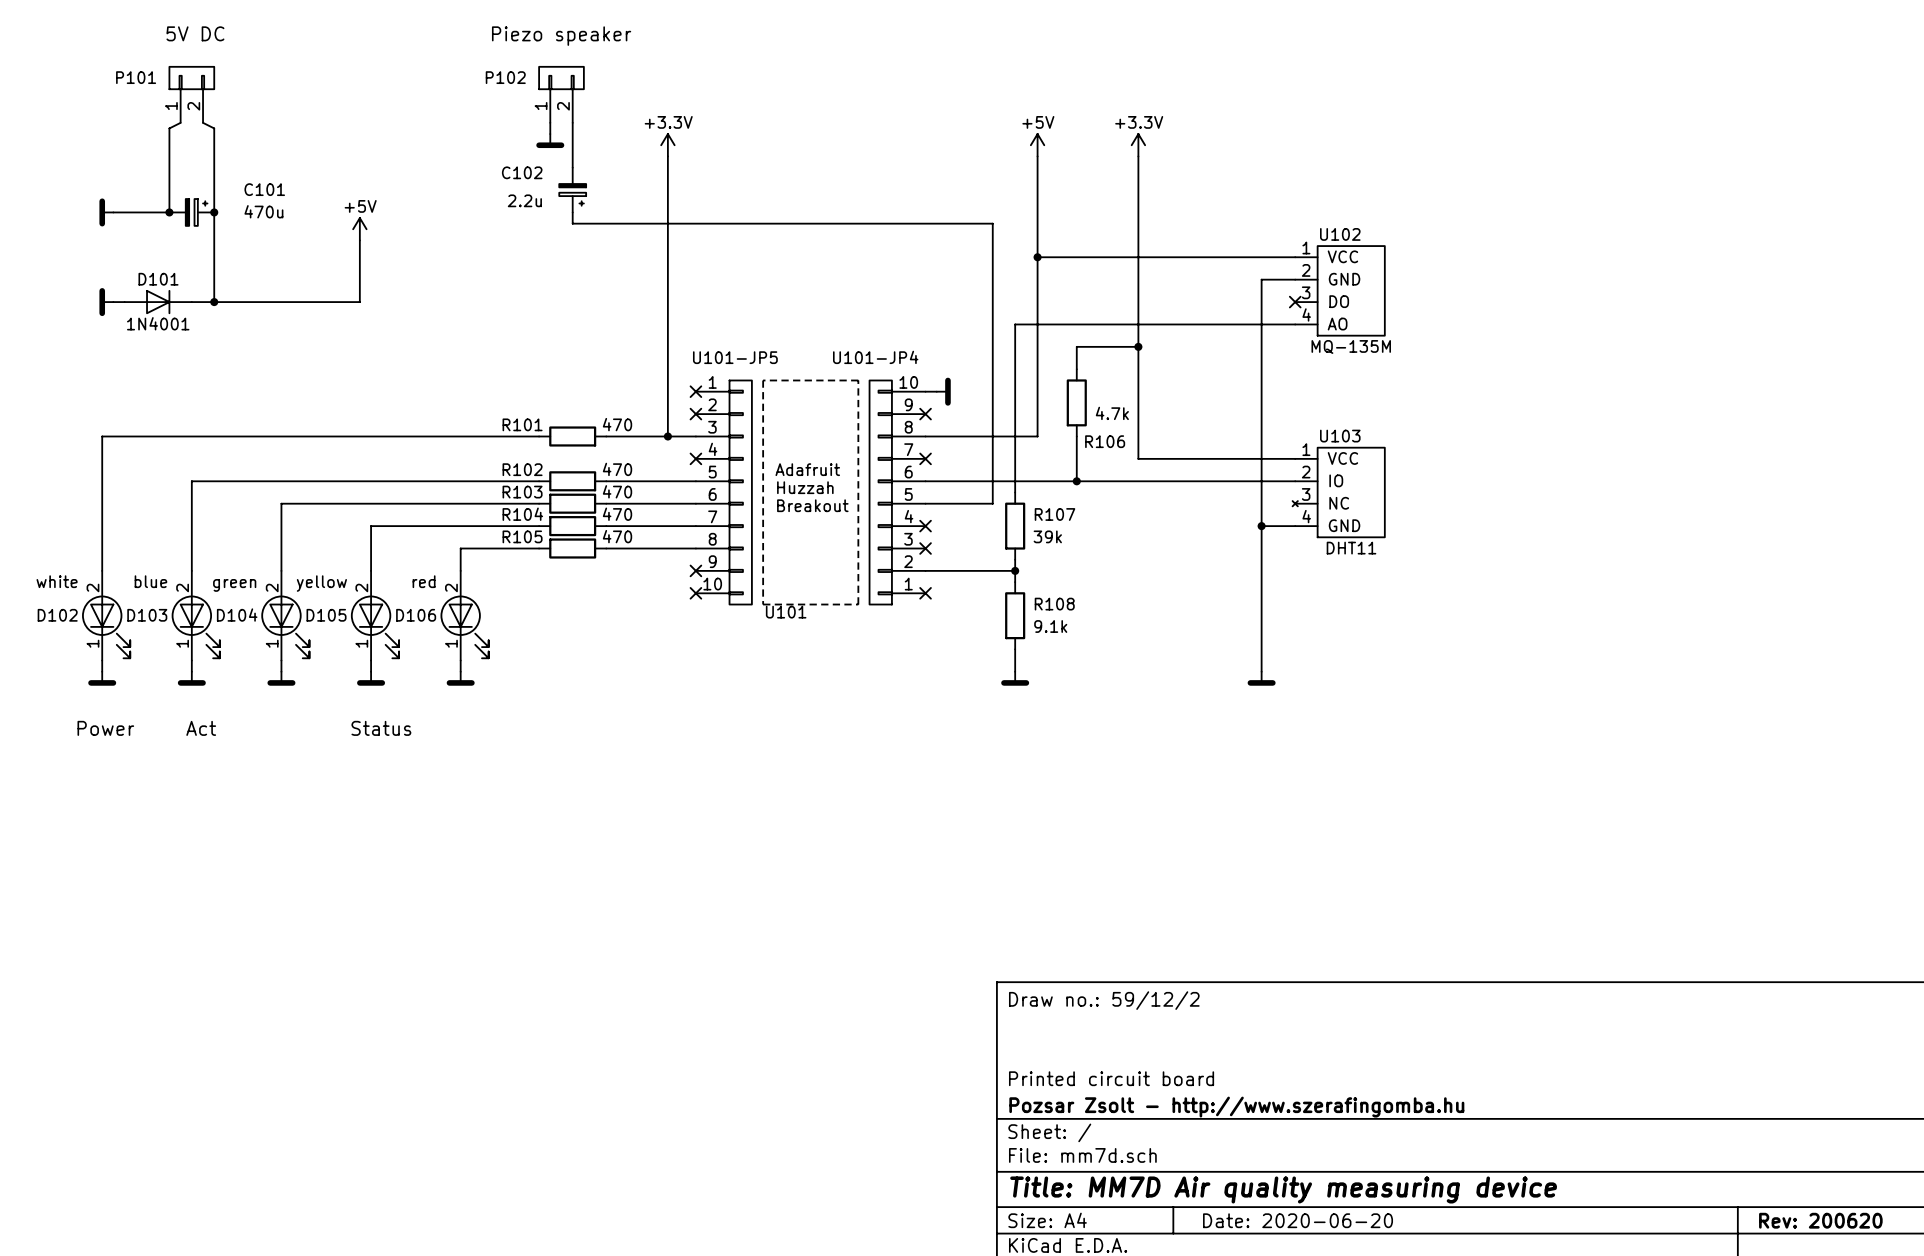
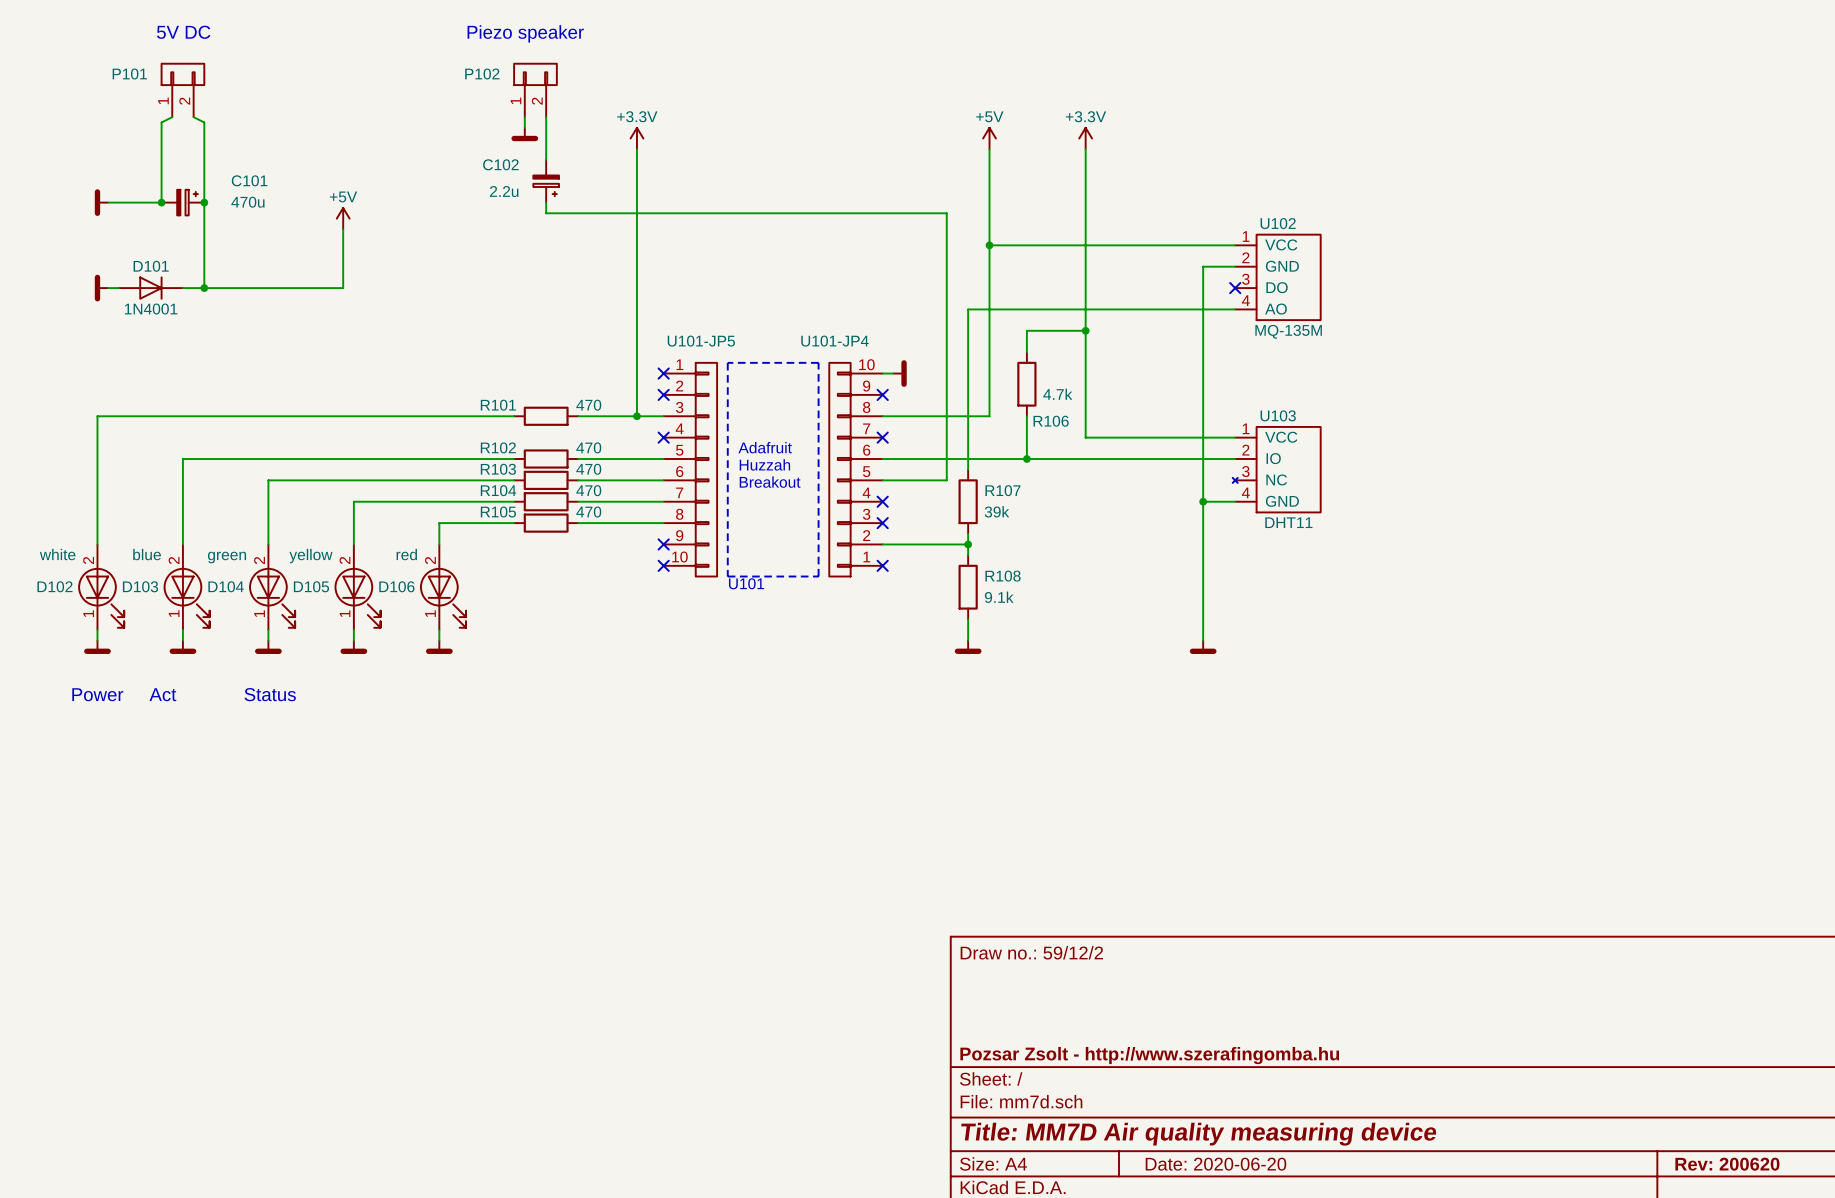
title block: Printed circuit board (1111, 1078) -> none

